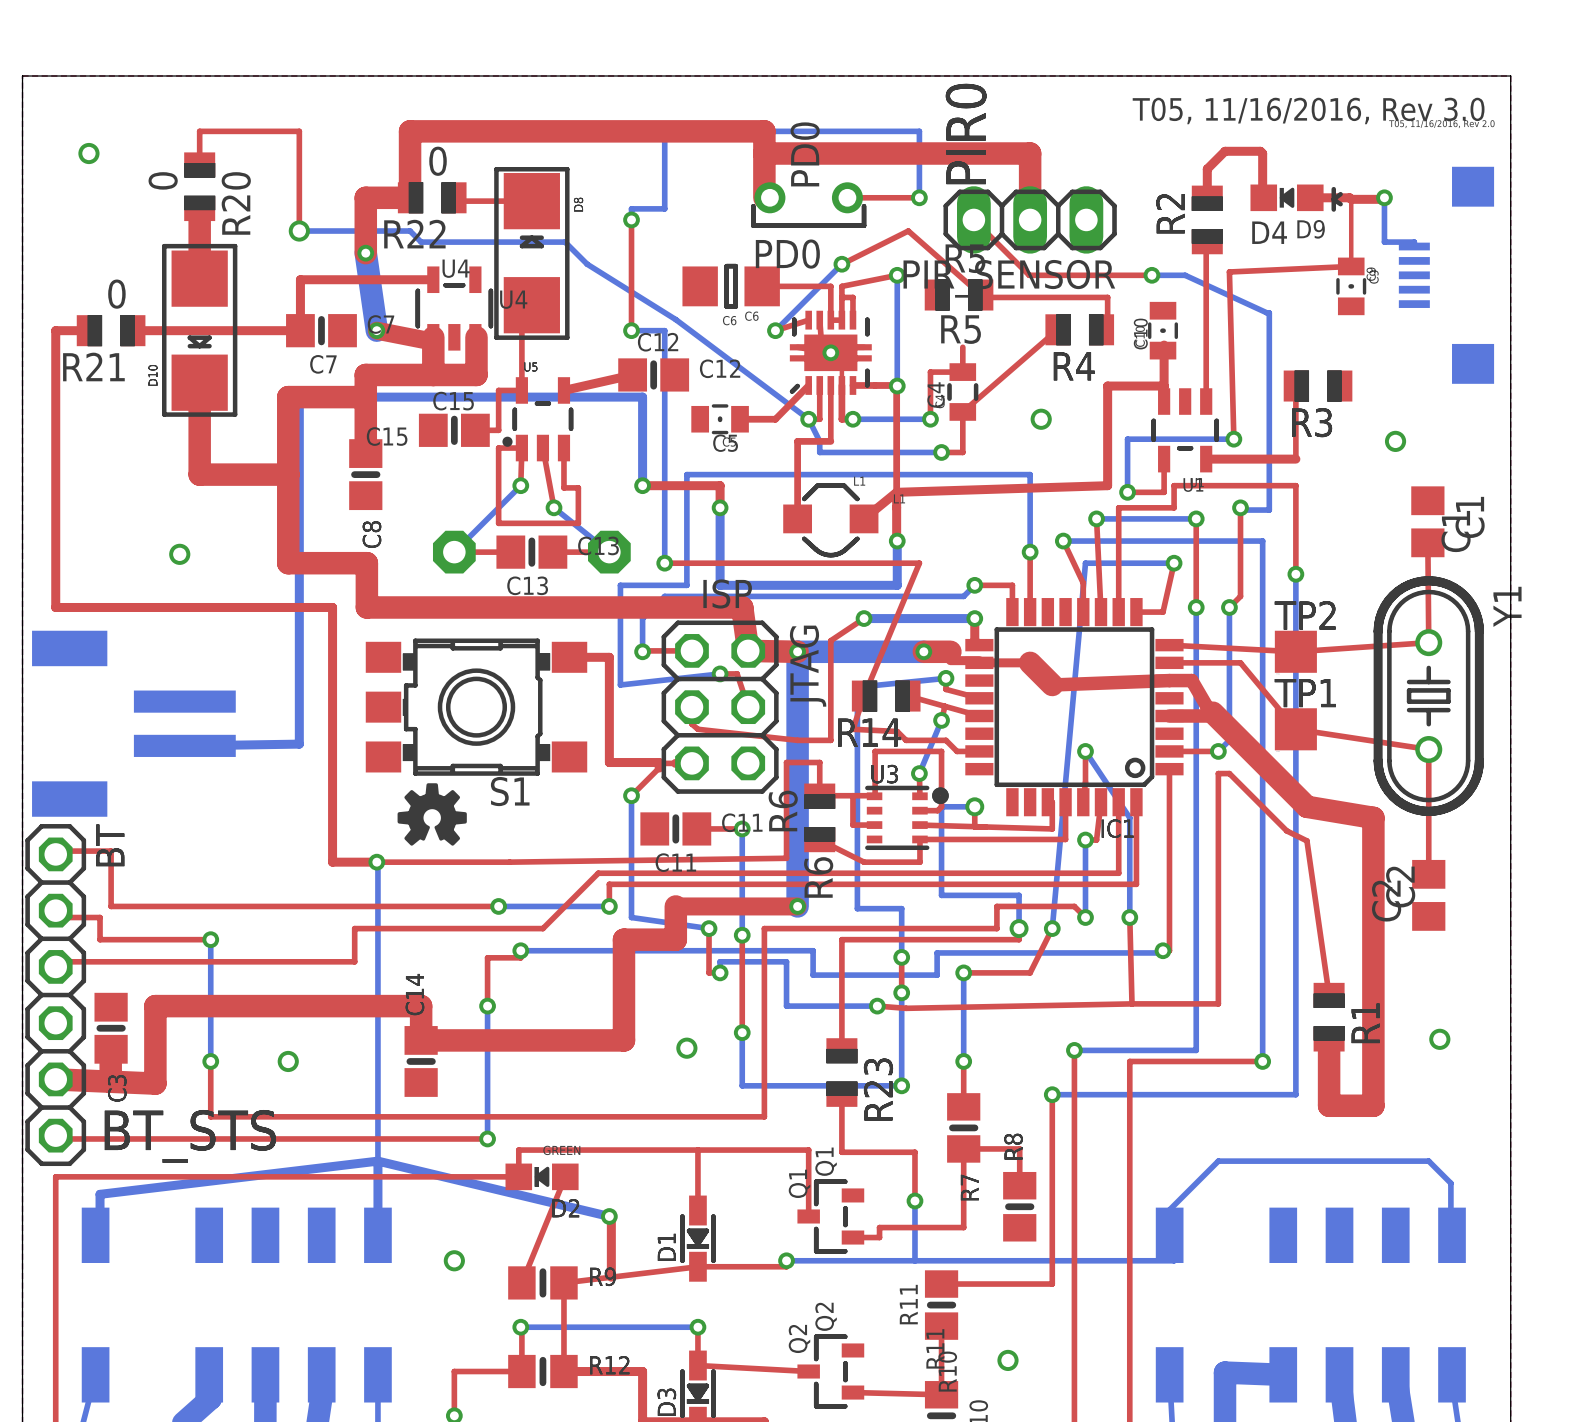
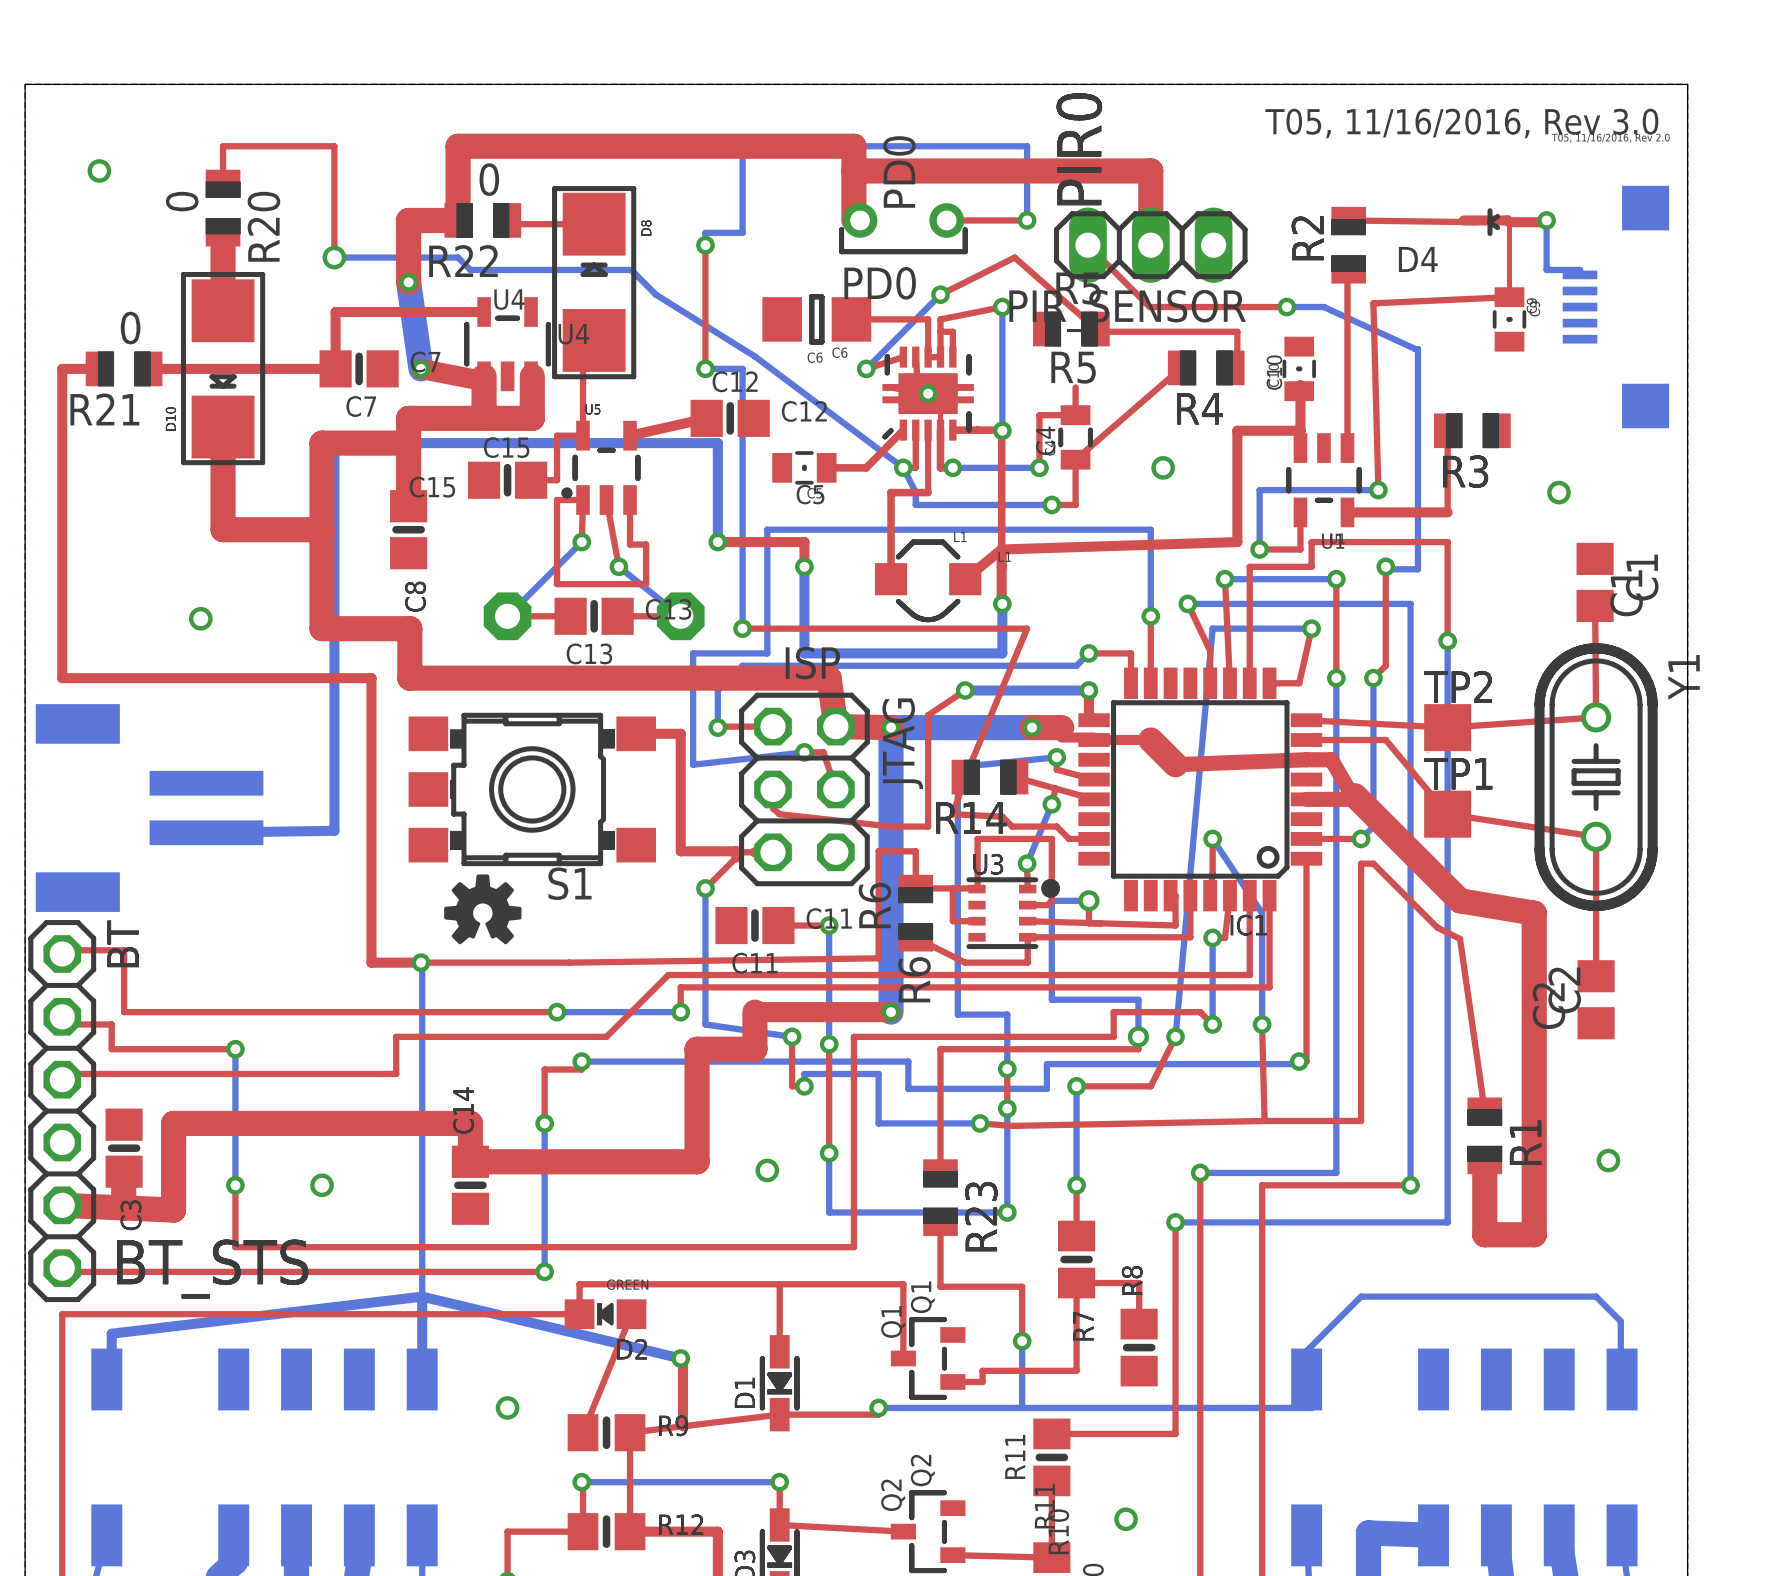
top track: (1207, 197) (1207, 169) (1225, 151) (1260, 151) (1262, 153) (1263, 197) -> (1348, 220) (1475, 222)
D9: (1287, 197) -> none

